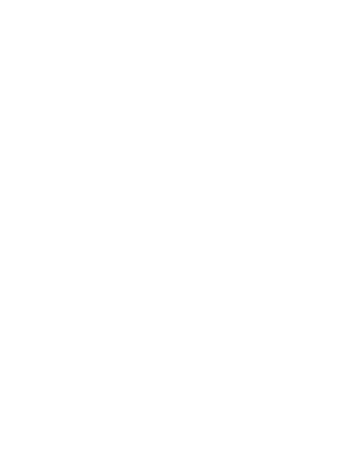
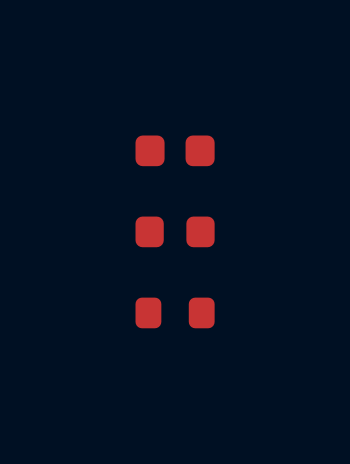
part: none -> (175, 150)
part: none -> (175, 231)
part: none -> (175, 312)

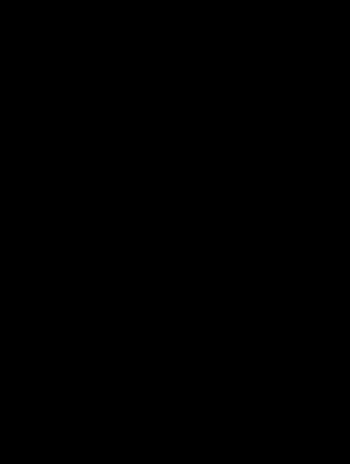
part: (175, 150) -> none
part: (175, 231) -> none
part: (175, 312) -> none

